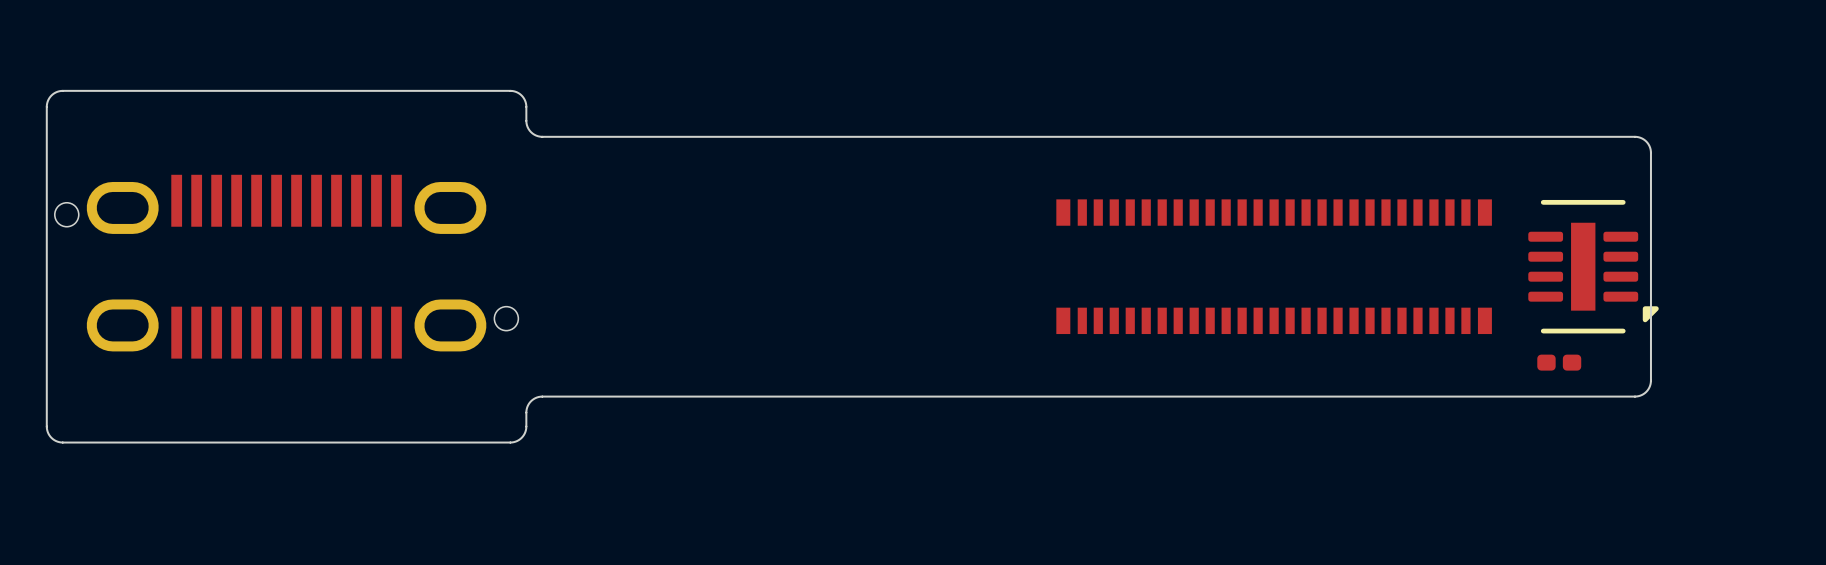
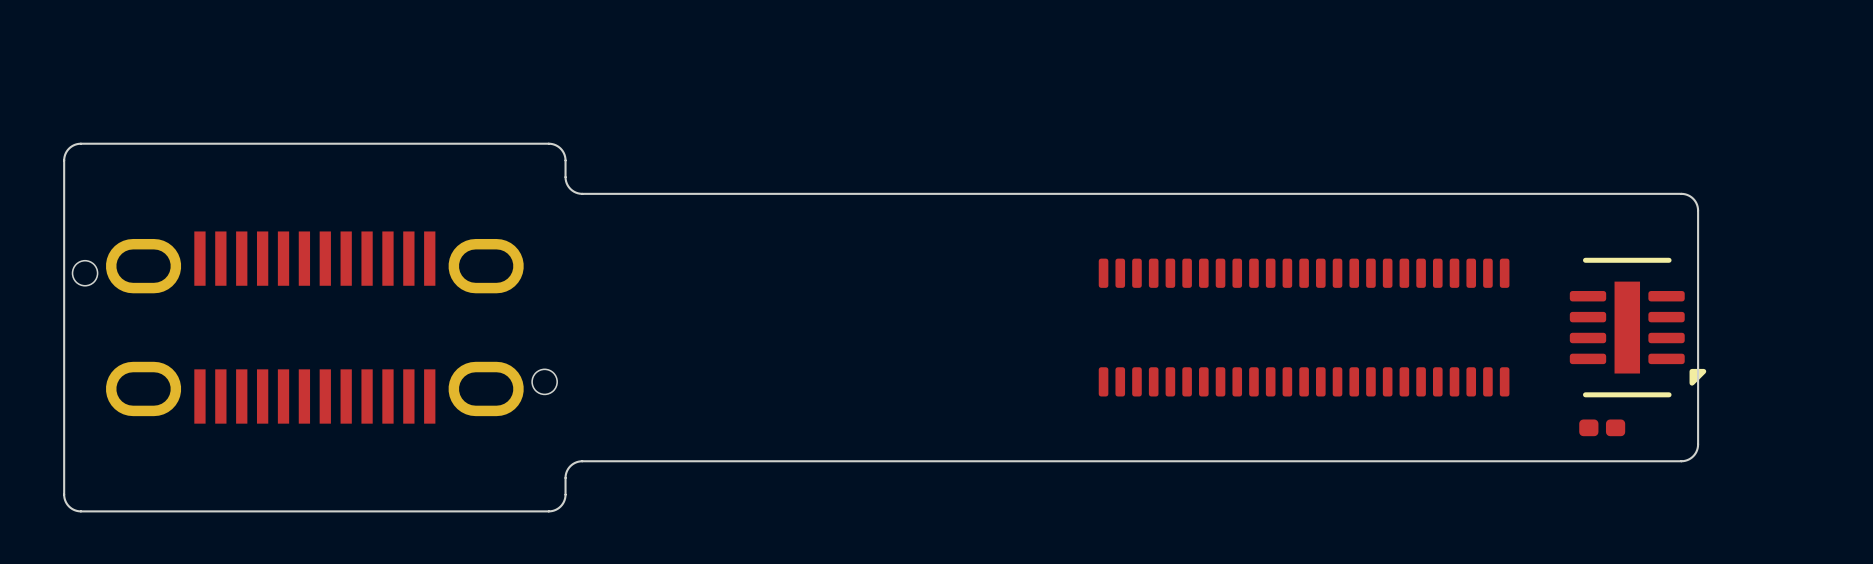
board edge: (526, 120) (531, 132) (542, 136) (1634, 136) (1646, 141) (1650, 152) (1650, 380) (1647, 390) (1638, 396) (542, 396) (531, 401) (526, 412) -> (565, 175) (566, 183) (570, 188) (582, 193) (1681, 193) (1693, 198) (1698, 210) (1698, 444) (1694, 454) (1685, 460) (582, 461) (574, 462) (569, 467) (565, 480)
part: none -> (1304, 327)
part: (1274, 266) -> none
part position: (1593, 266) -> (1638, 327)
part position: (1559, 362) -> (1602, 427)

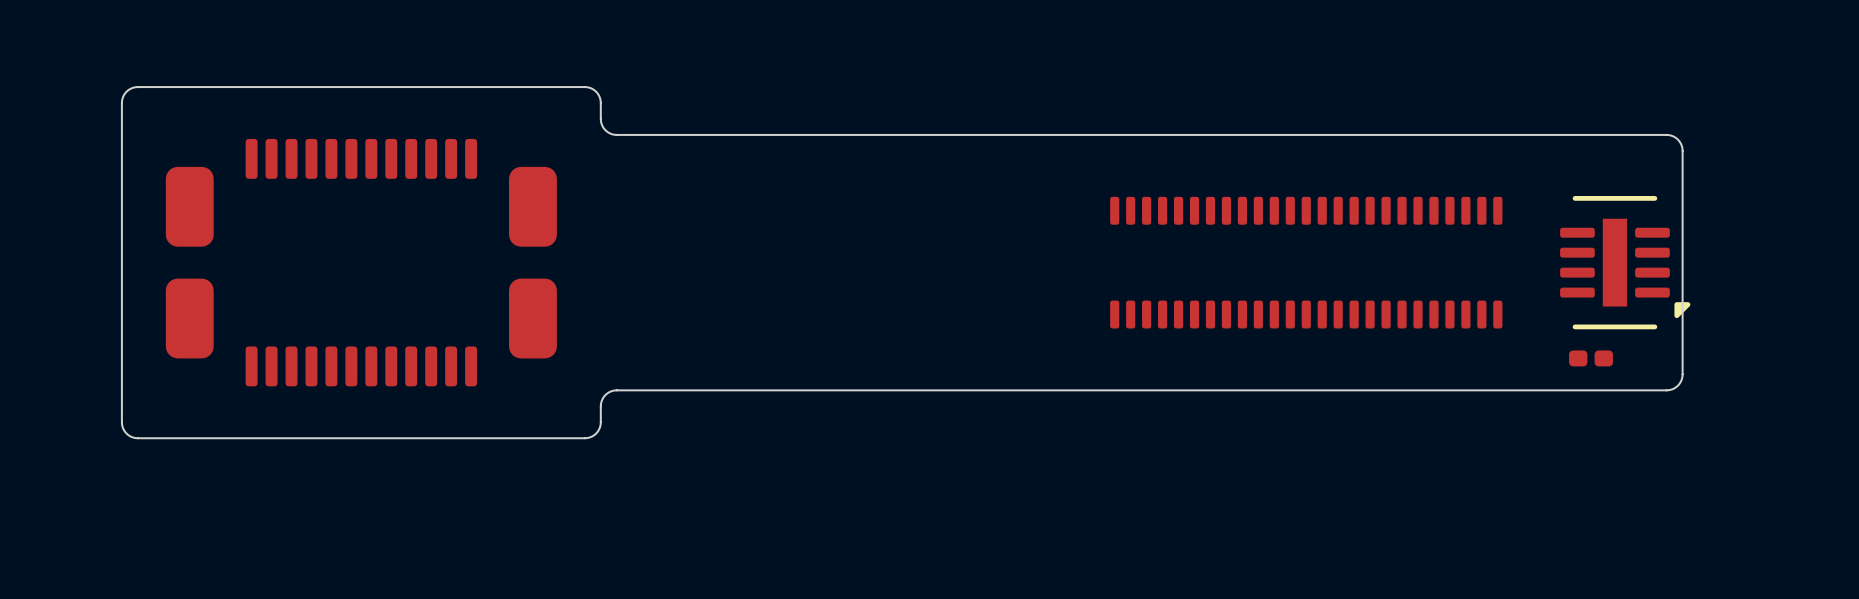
part footprint: [72, 231, 558, 424] -> [165, 138, 557, 387]

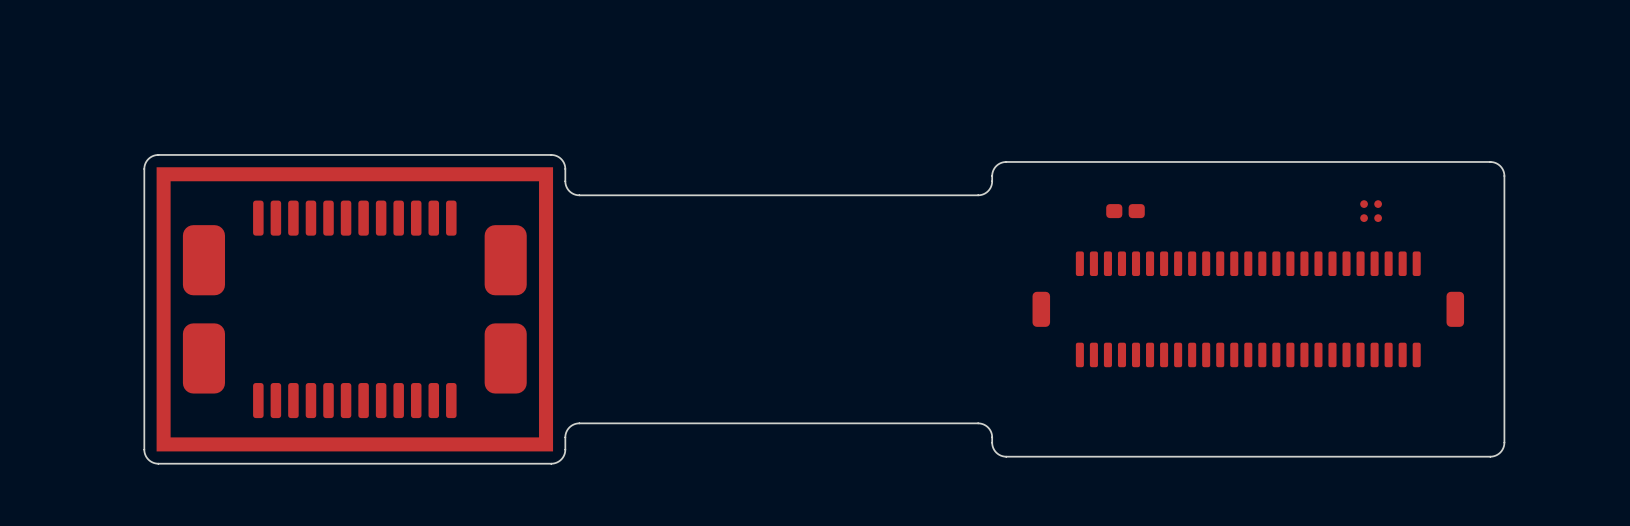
board edge: (600, 116) (602, 125) (605, 130) (616, 134) (1666, 134) (1677, 139) (1682, 150) (1682, 374) (1679, 384) (1670, 389) (616, 390) (609, 391) (604, 396) (600, 408) -> (565, 181) (569, 191) (579, 195) (978, 195) (985, 193) (990, 188) (995, 167) (1006, 161) (1490, 161) (1500, 166) (1504, 176) (1504, 442) (1501, 451) (1494, 456) (1006, 456) (999, 454) (994, 449) (989, 428) (978, 423) (579, 423) (569, 427) (565, 437)
part: none -> (1371, 211)
part: none -> (354, 309)
part: (1306, 262) -> none
part: none -> (1248, 309)
part: (1625, 262) -> none
part position: (1591, 358) -> (1125, 211)

